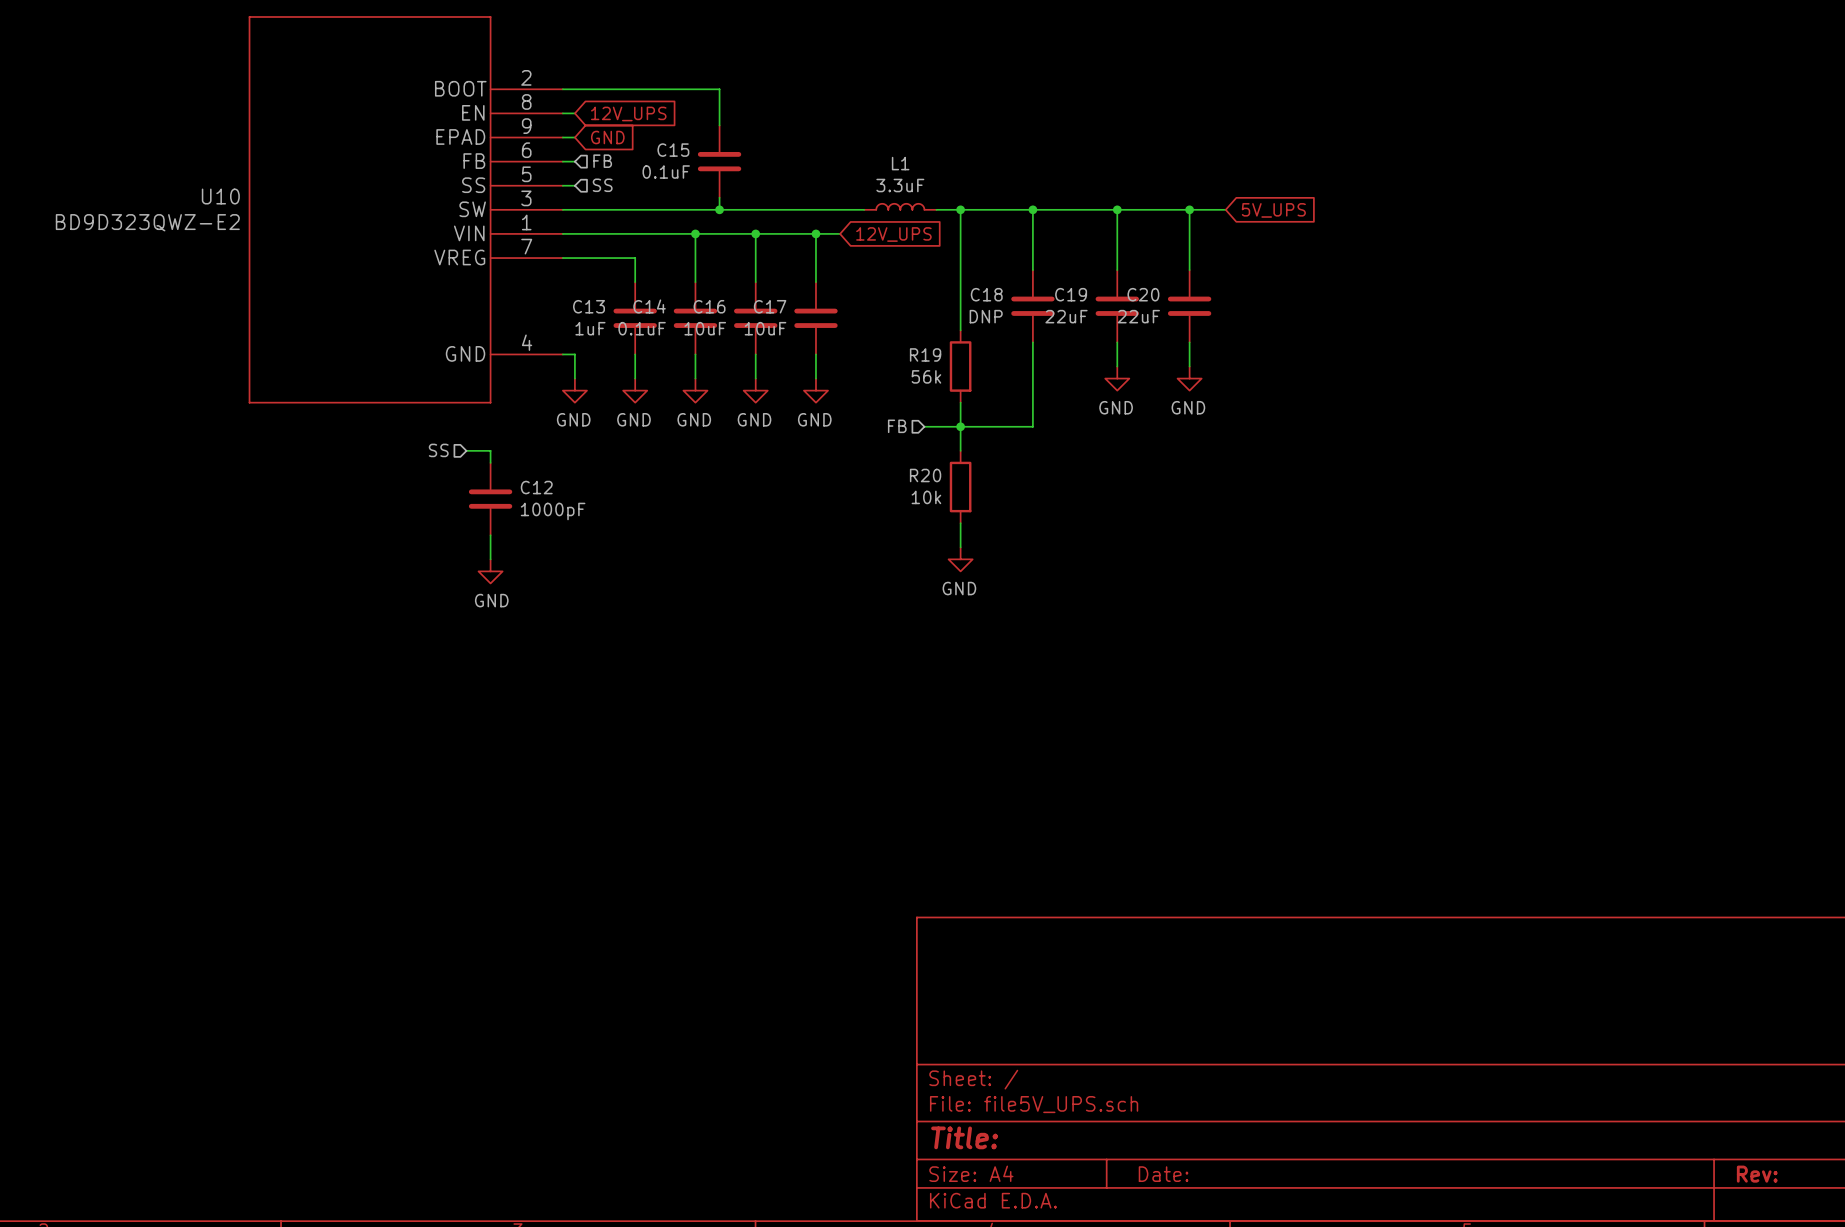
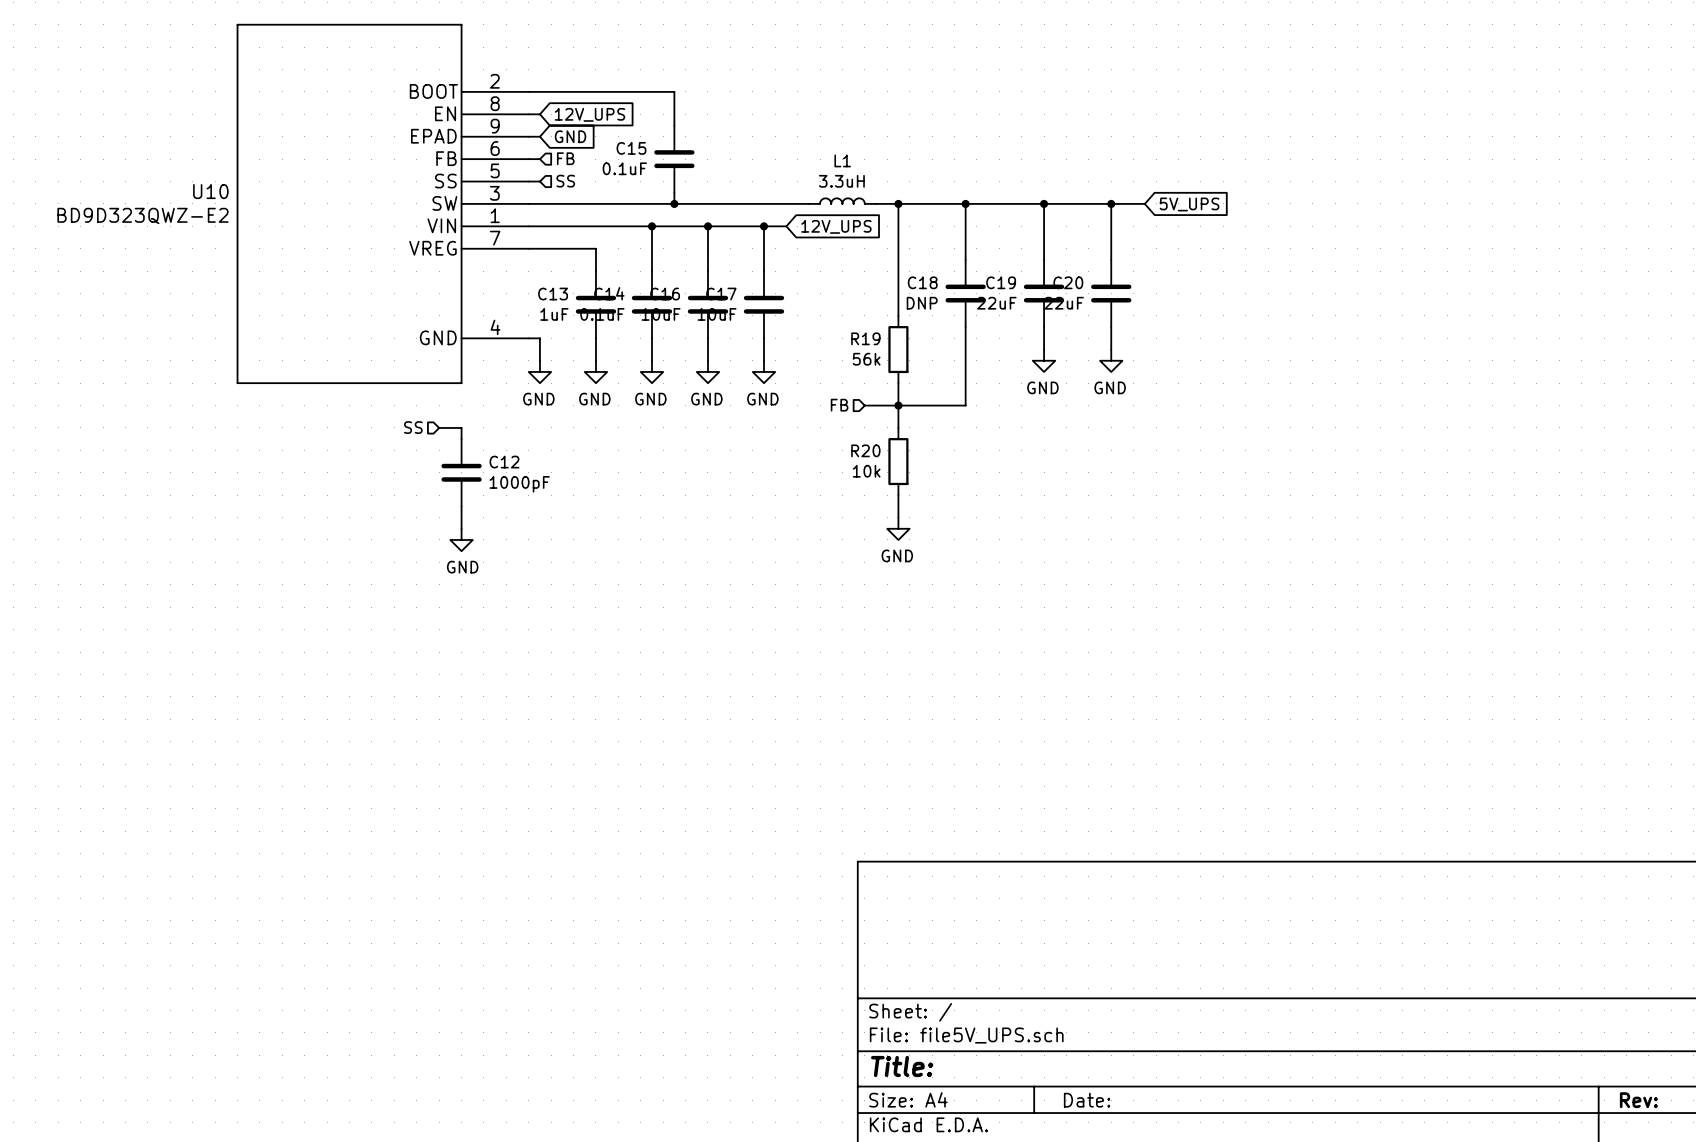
L1 value: 3.3uF (900, 185) -> 3.3uH (841, 181)

